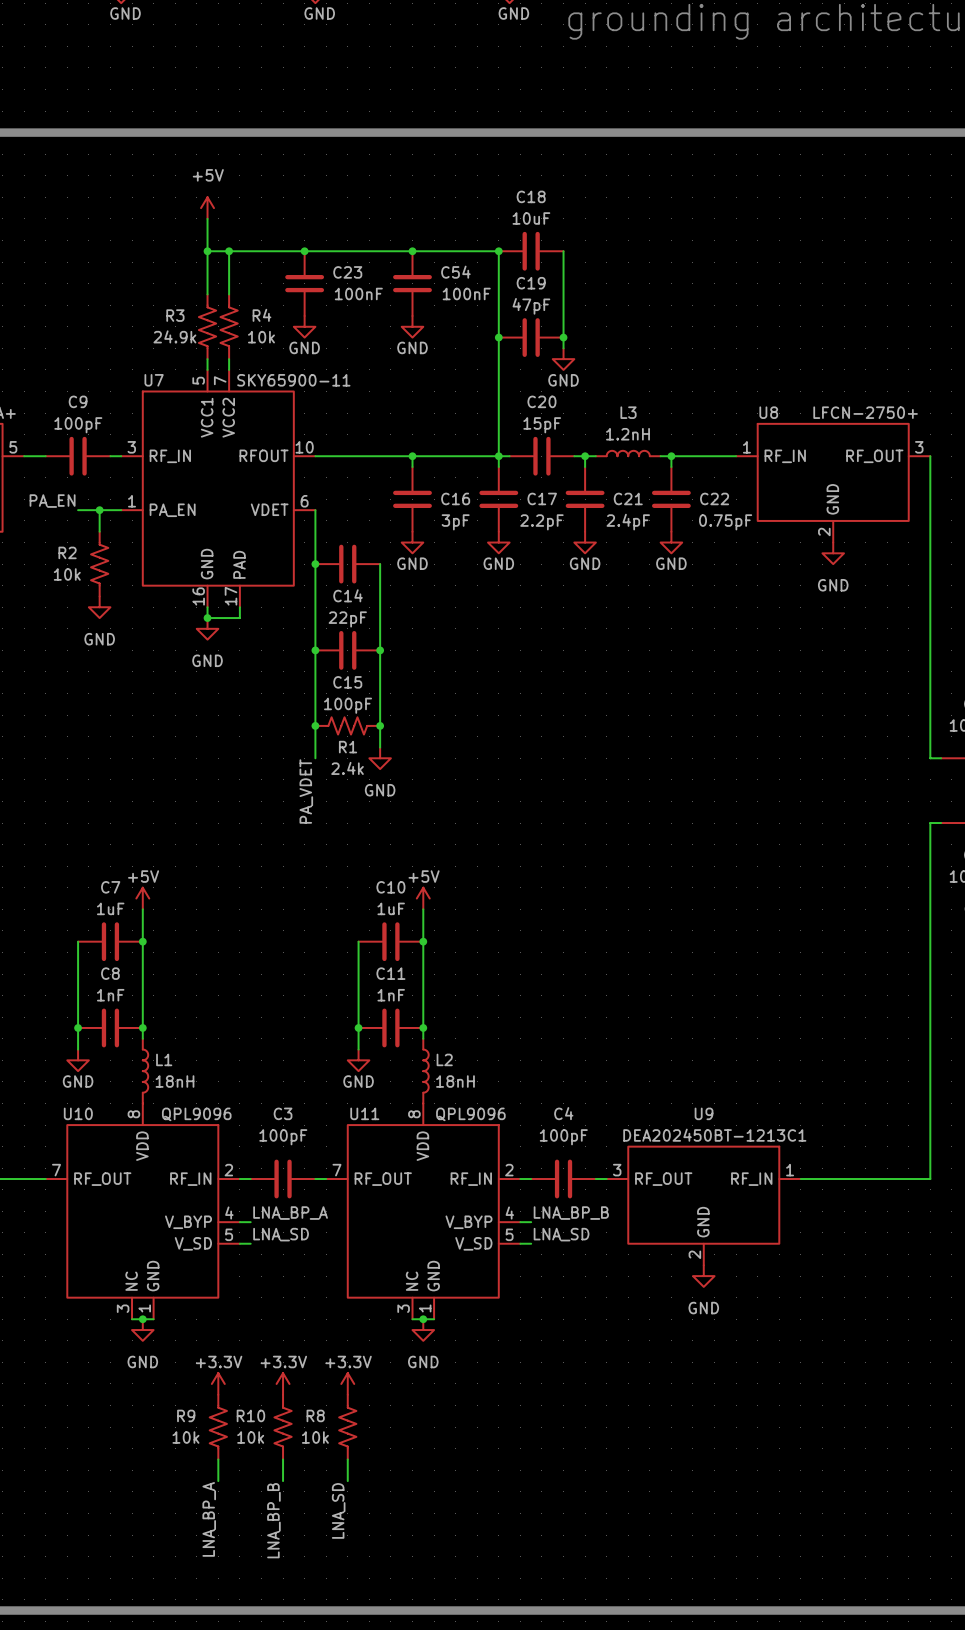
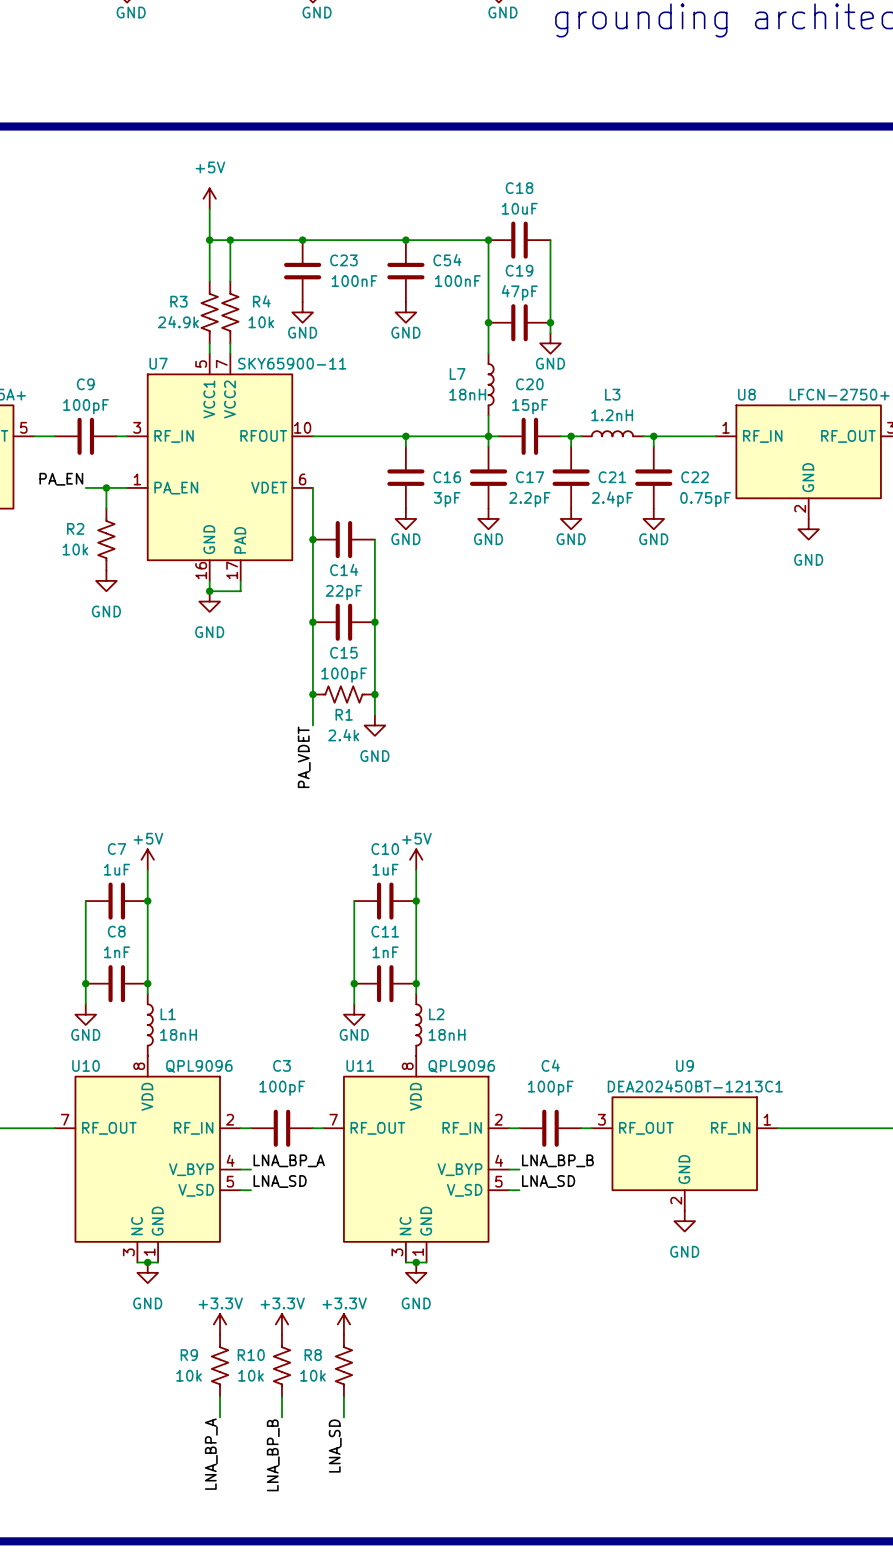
wire: (498, 369) (498, 434) -> none
L7: none -> 18nH (491, 384)

